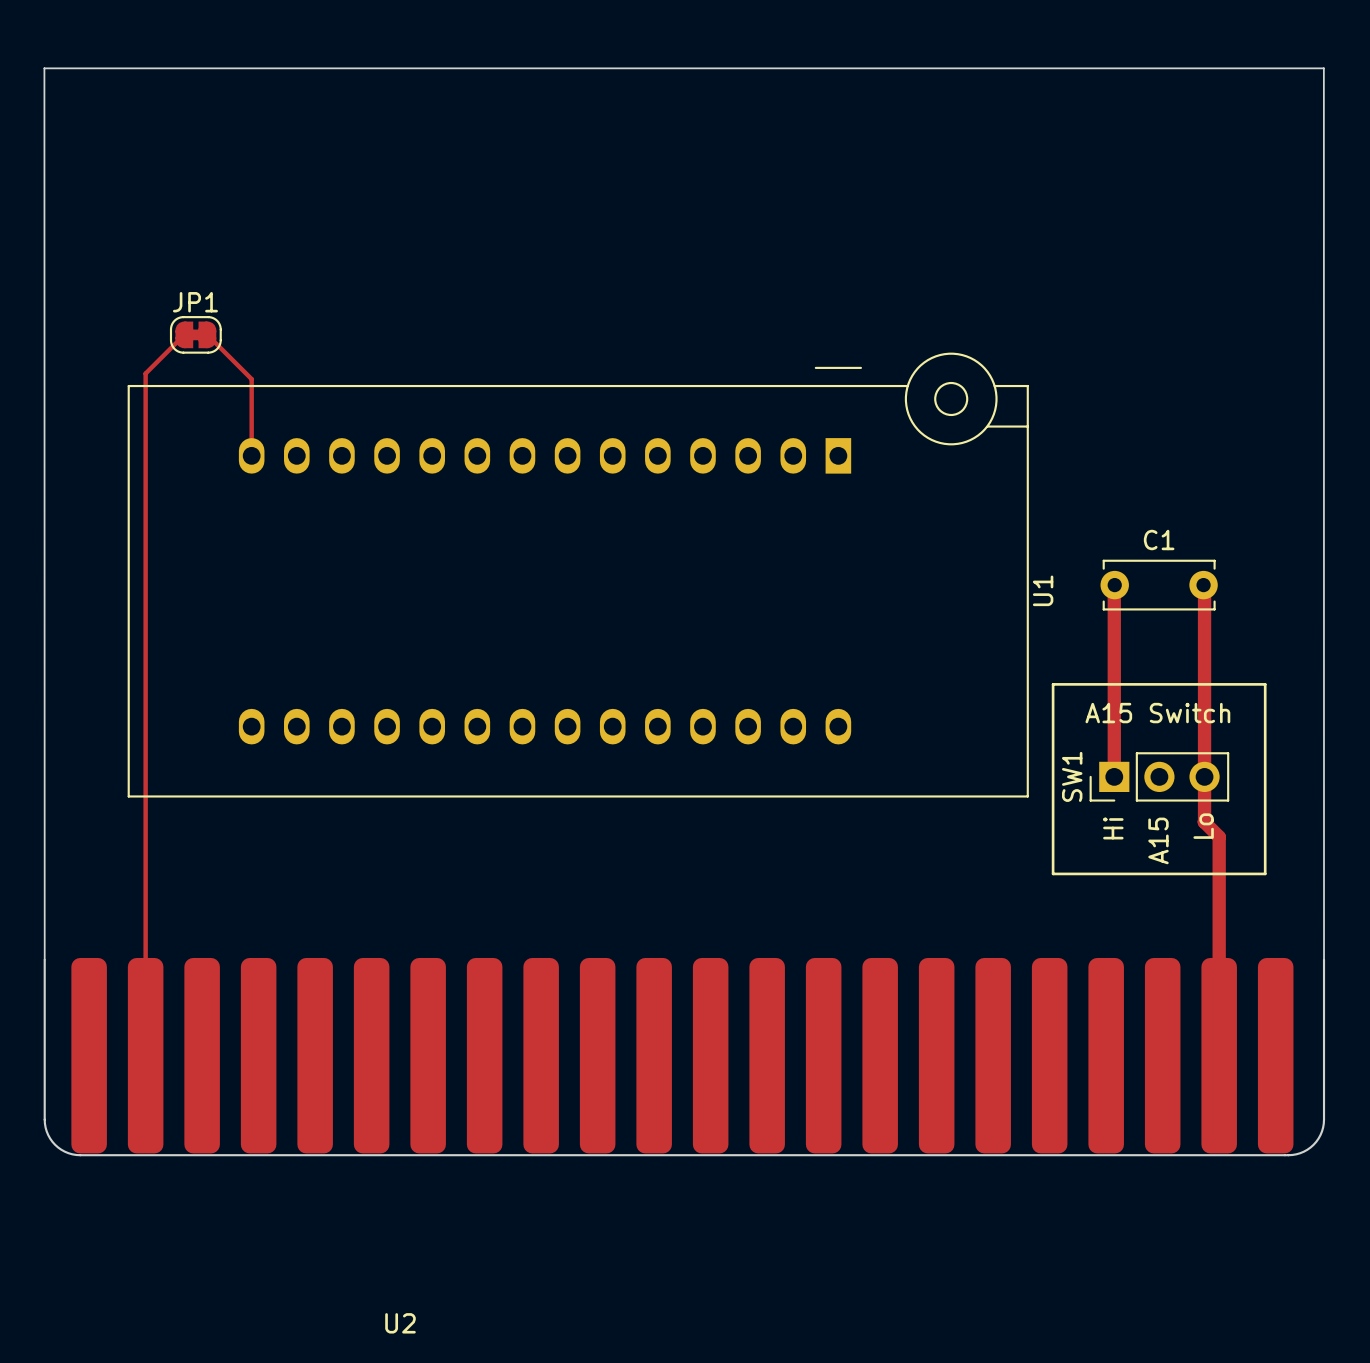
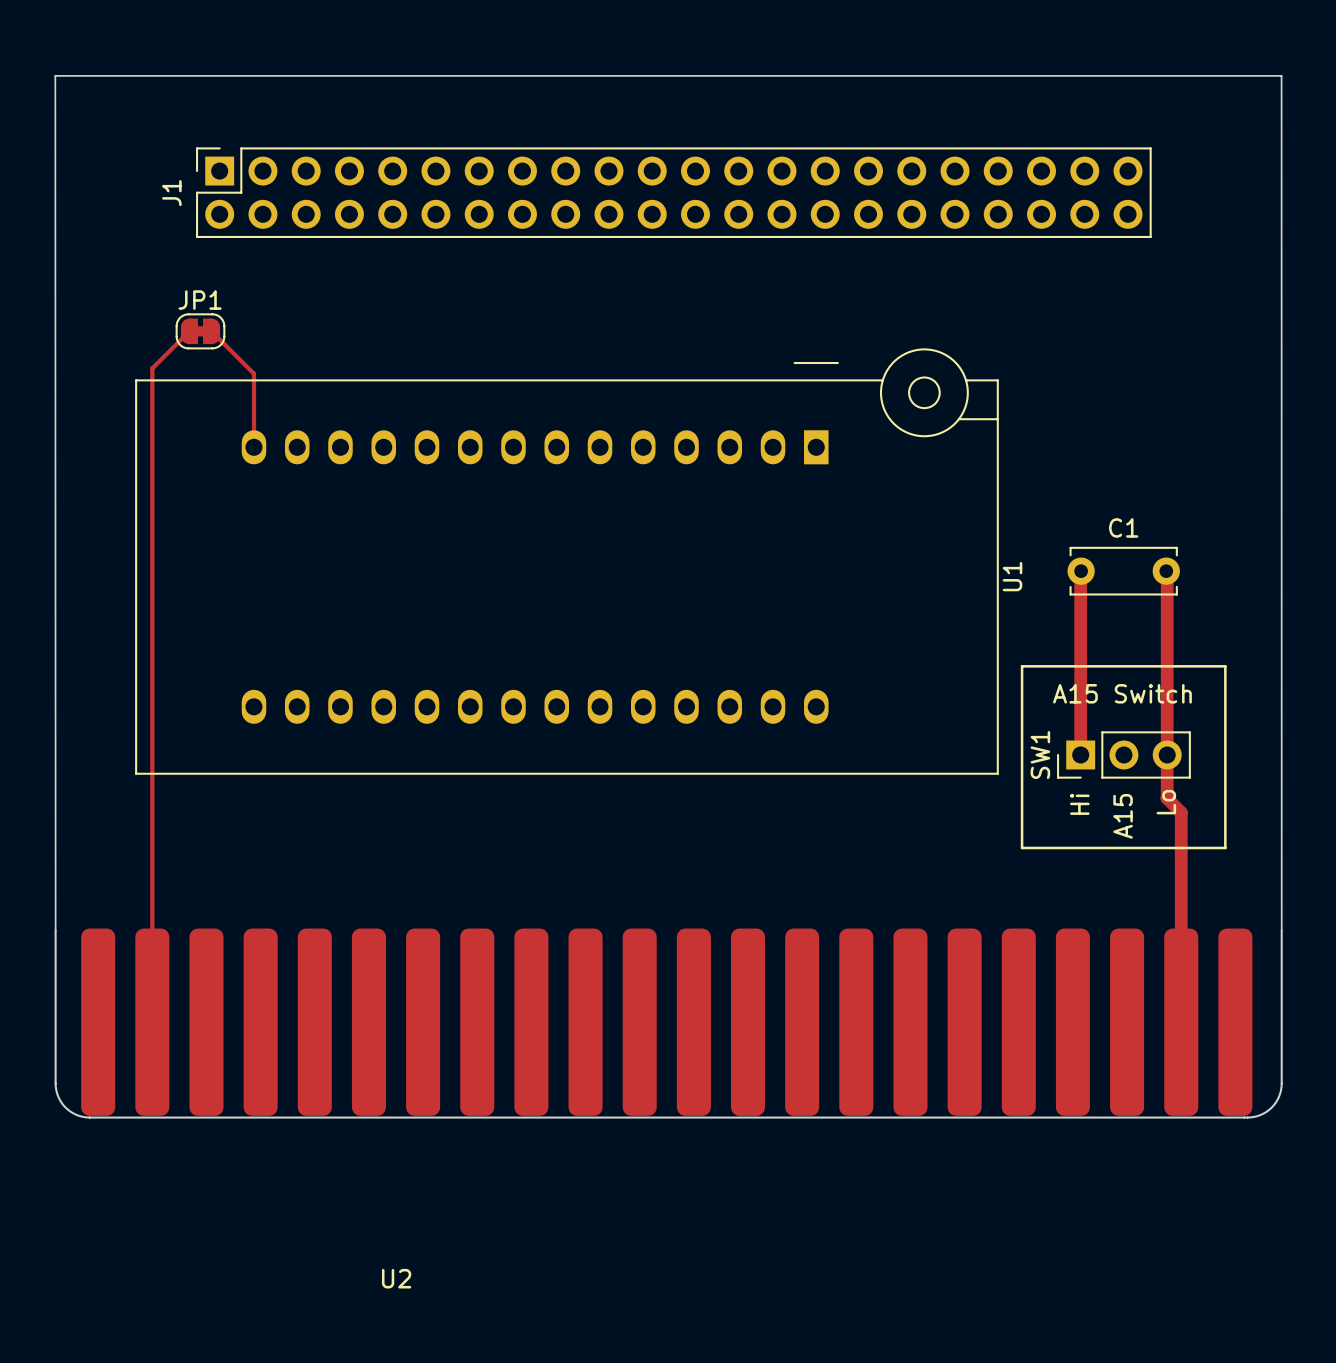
J1: none -> (673, 192)

